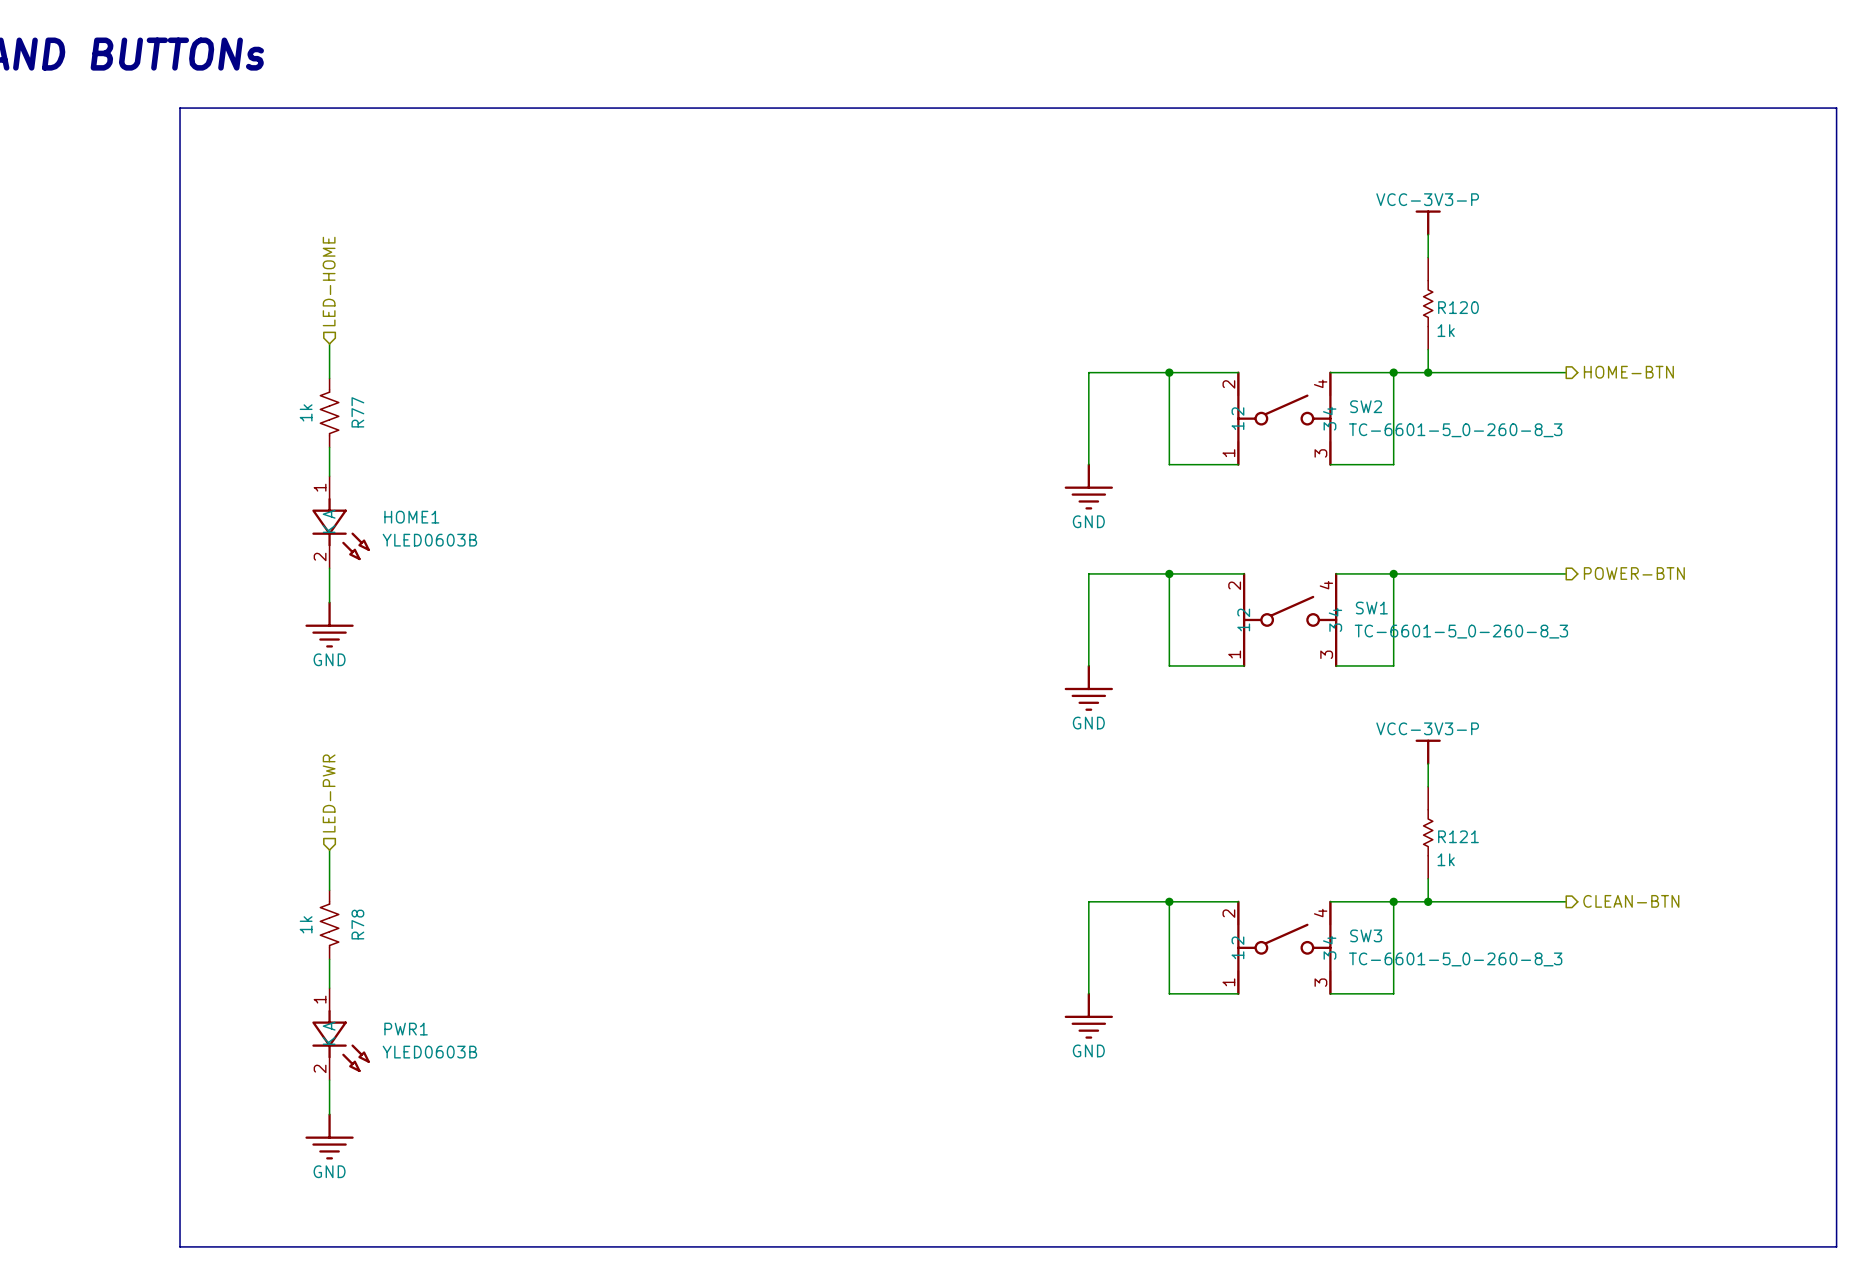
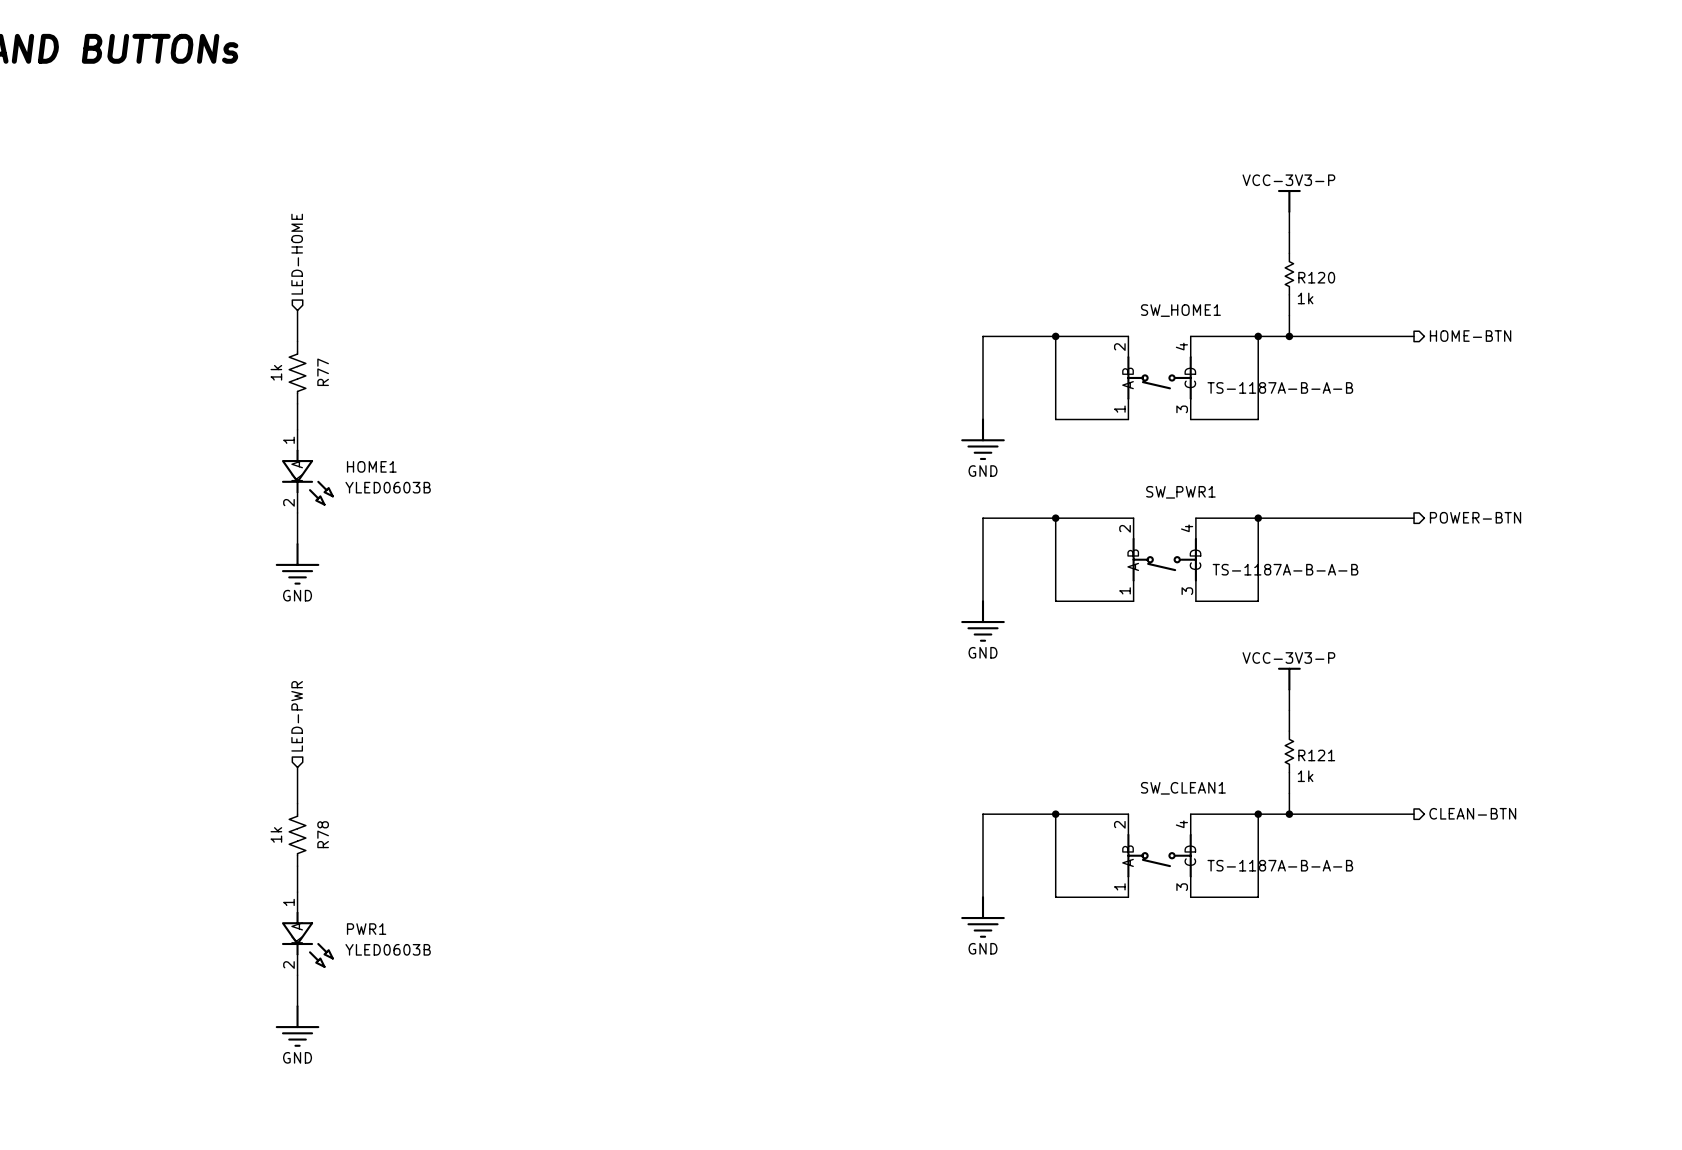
line: (180, 108) (1836, 108) (1836, 1246) (180, 1246) (180, 108) -> none
wire: none -> (1118, 336) (1128, 336)
wire: none -> (1190, 336) (1201, 336)
SW2: TC-6601-5_0-260-8_3 (1284, 418) -> none
SW_HOME1: none -> TS-1187A-B-A-B (1159, 377)
wire: none -> (1118, 419) (1128, 419)
wire: none -> (1190, 419) (1201, 419)
wire: none -> (1123, 518) (1133, 518)
wire: none -> (1195, 518) (1206, 518)
SW1: TC-6601-5_0-260-8_3 (1290, 619) -> none
SW_PWR1: none -> TS-1187A-B-A-B (1164, 559)
wire: none -> (1123, 601) (1133, 601)
wire: none -> (1195, 601) (1206, 601)
wire: none -> (1118, 814) (1128, 814)
wire: none -> (1190, 814) (1201, 814)
SW3: TC-6601-5_0-260-8_3 (1284, 947) -> none
SW_CLEAN1: none -> TS-1187A-B-A-B (1159, 855)
wire: none -> (1118, 897) (1128, 897)
wire: none -> (1190, 897) (1201, 897)

